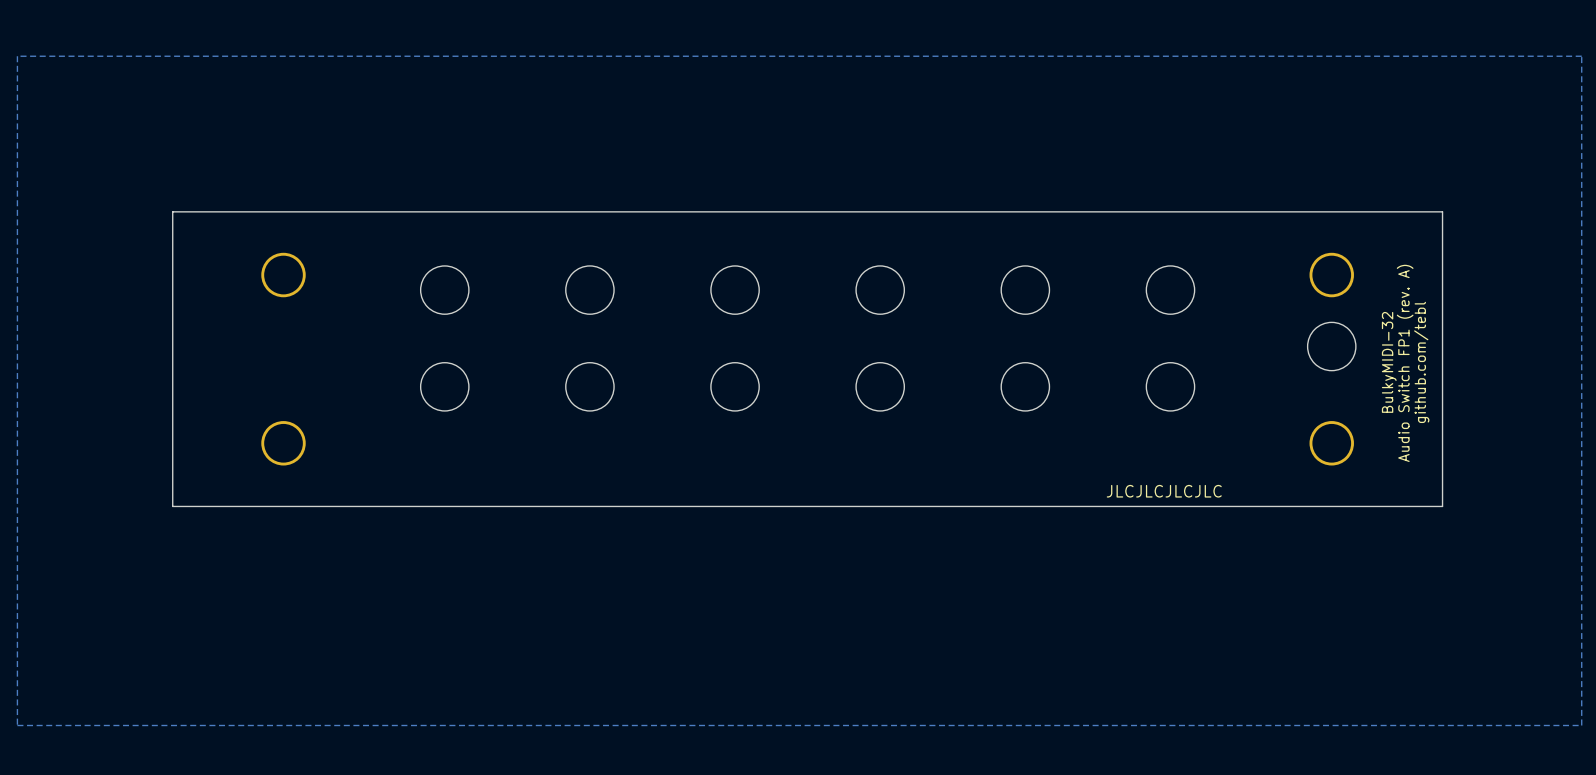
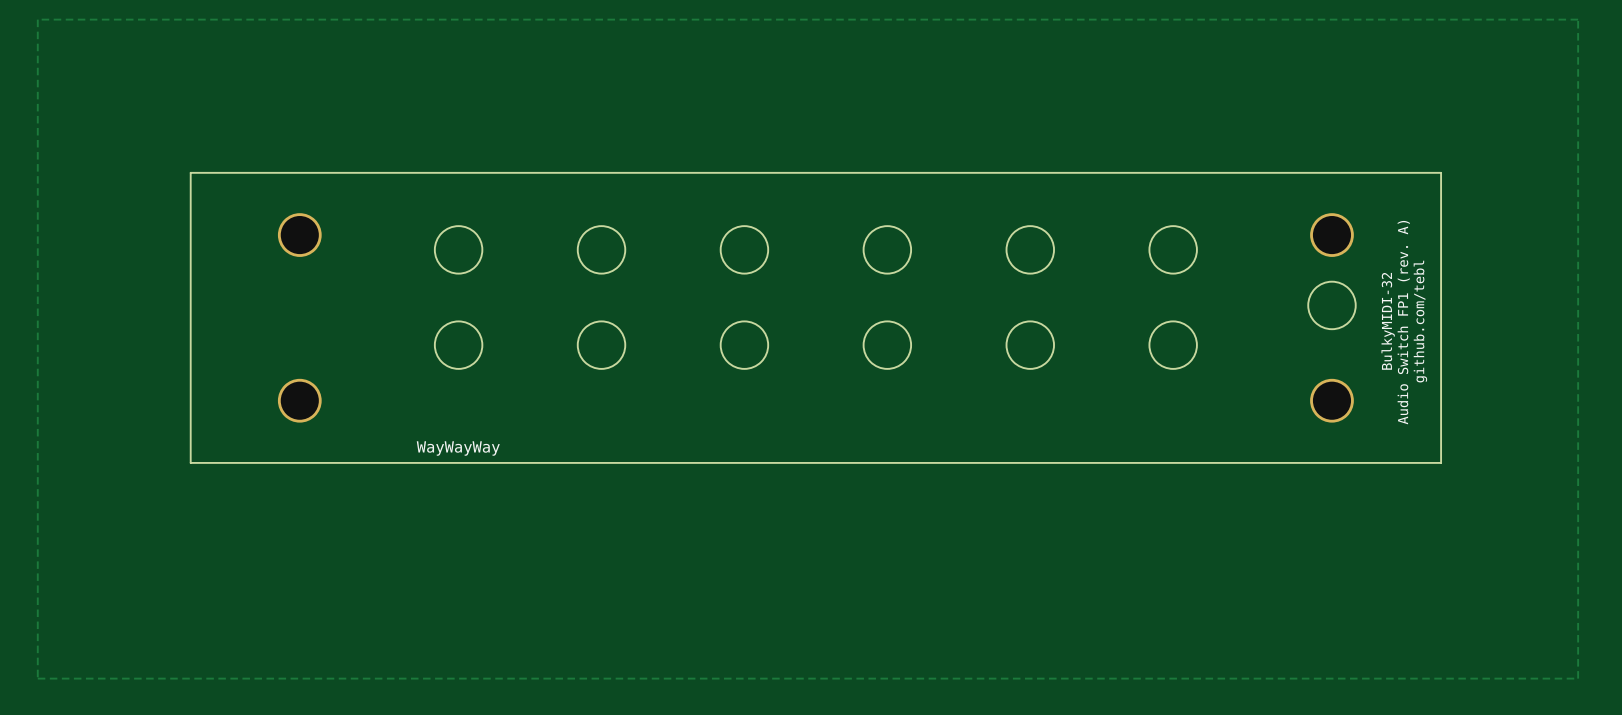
text: JLCJLCJLCJLC (1164, 491) -> none
text: none -> WayWayWay (458, 448)

